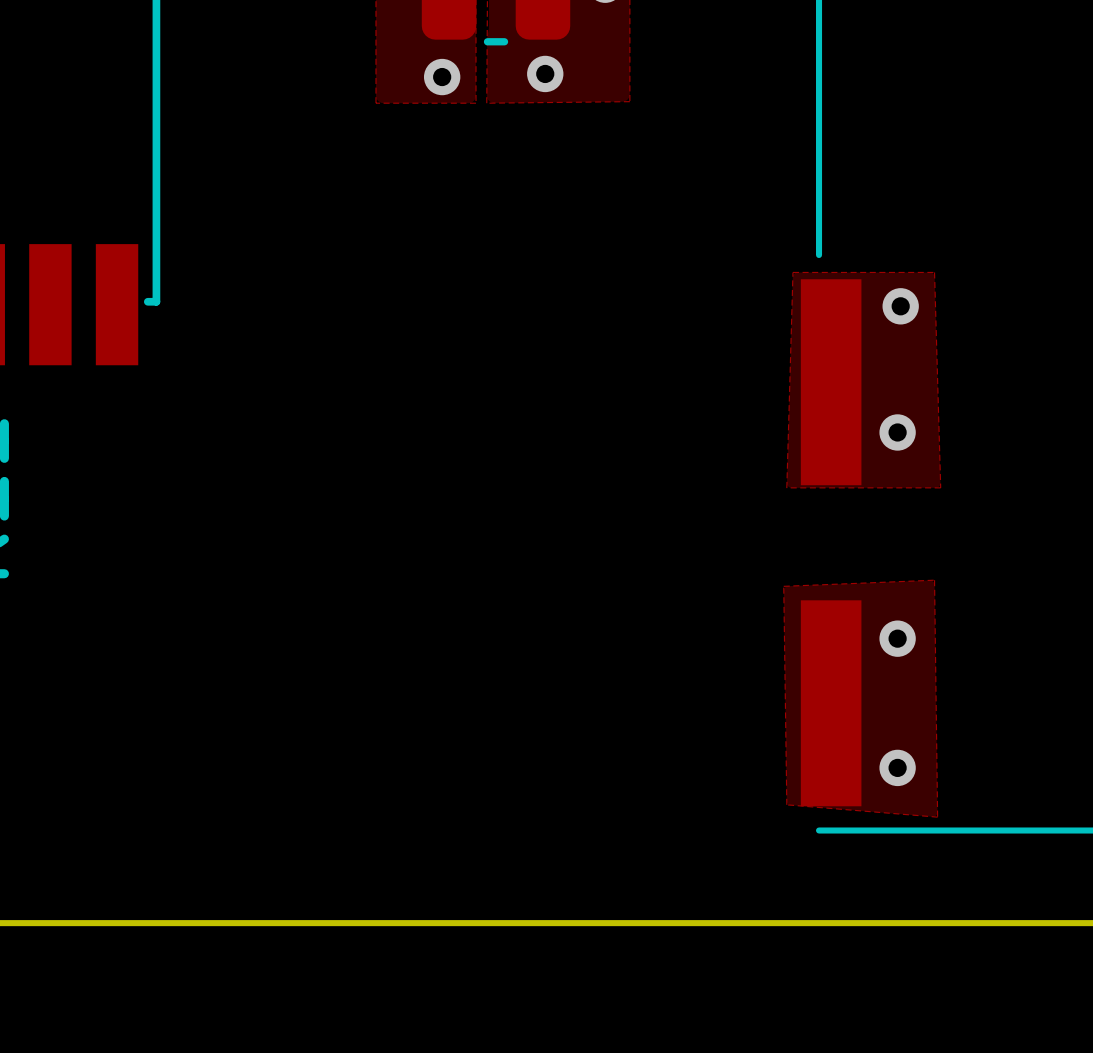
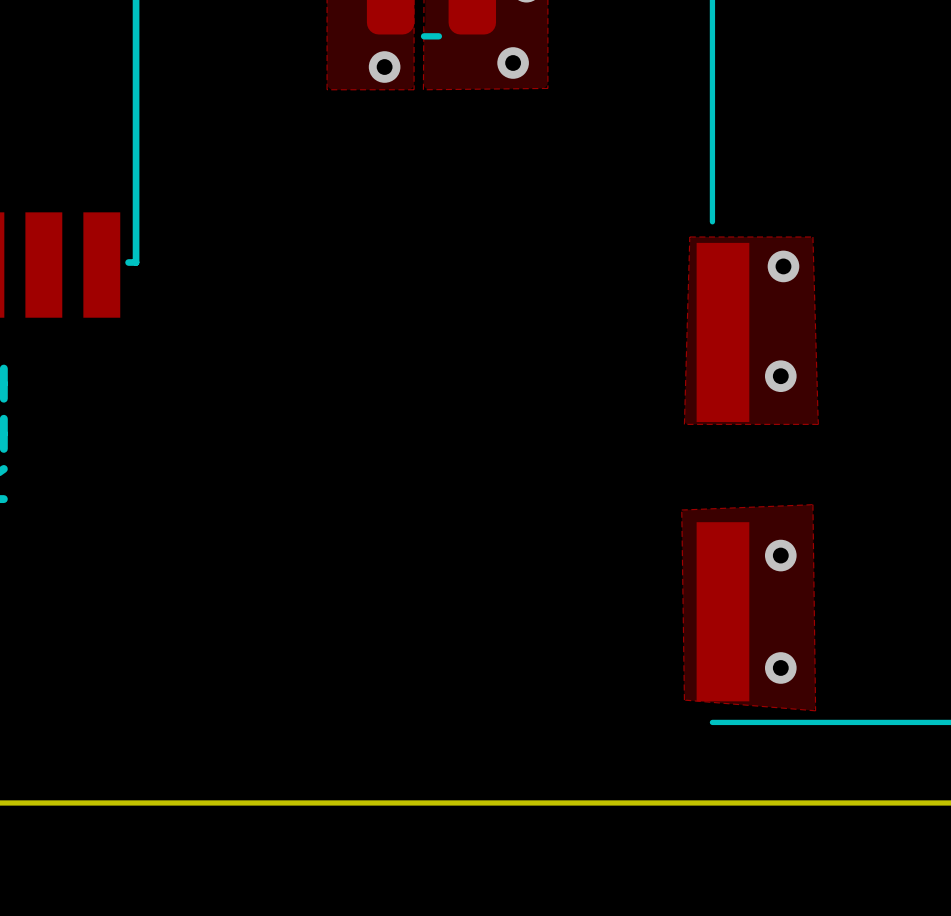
via position: (545, 73) -> (513, 63)

